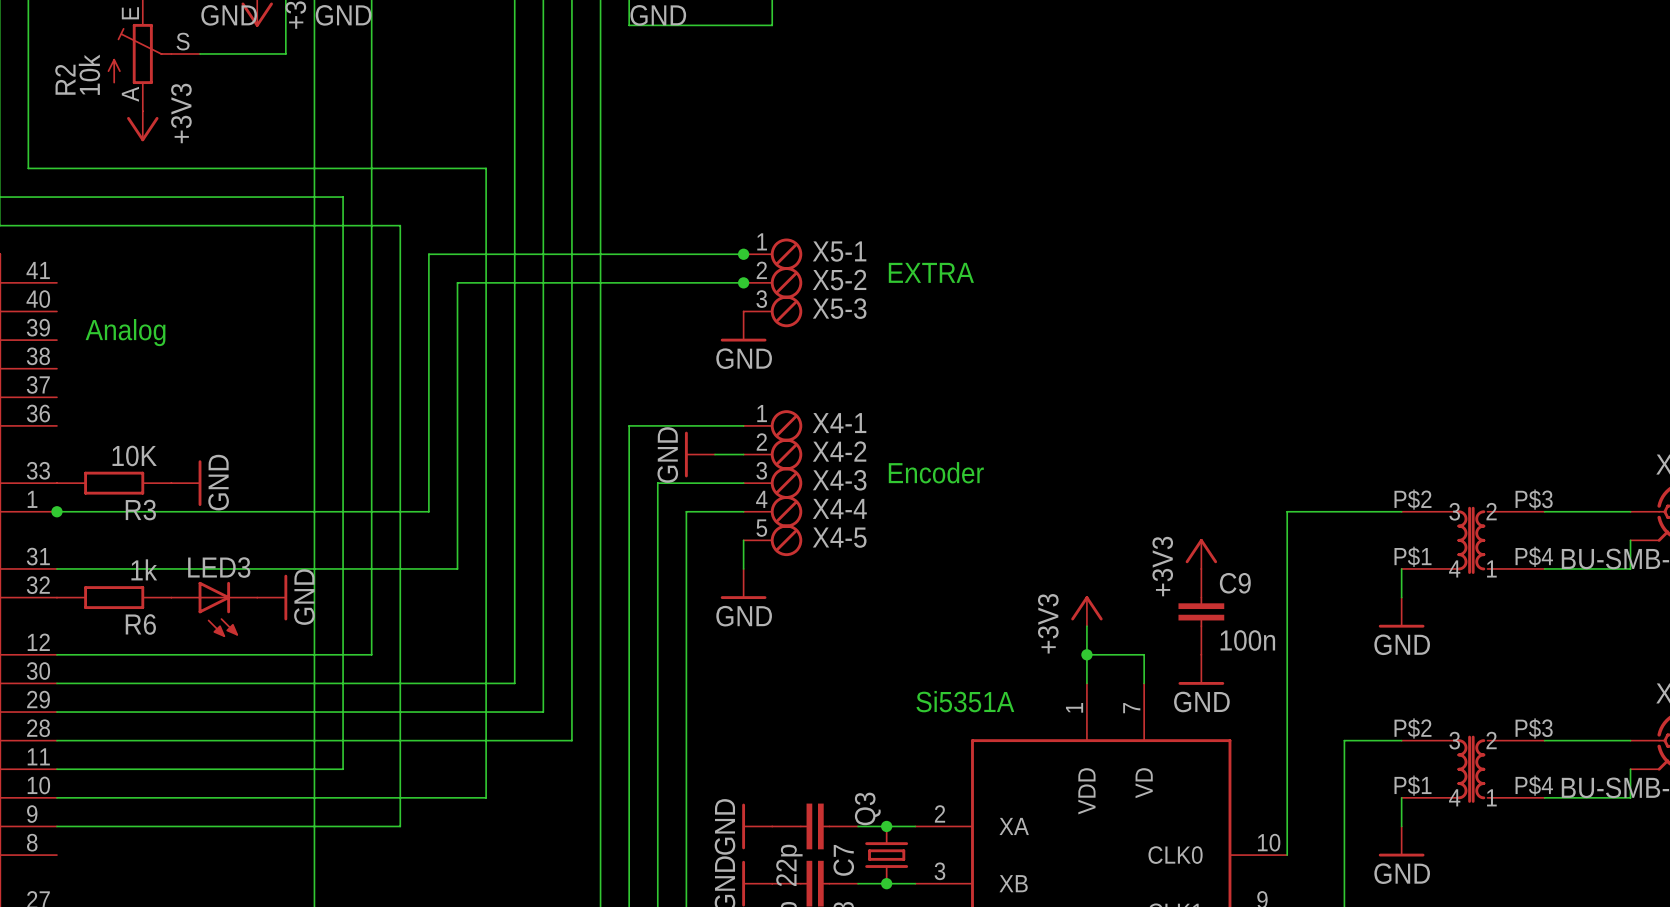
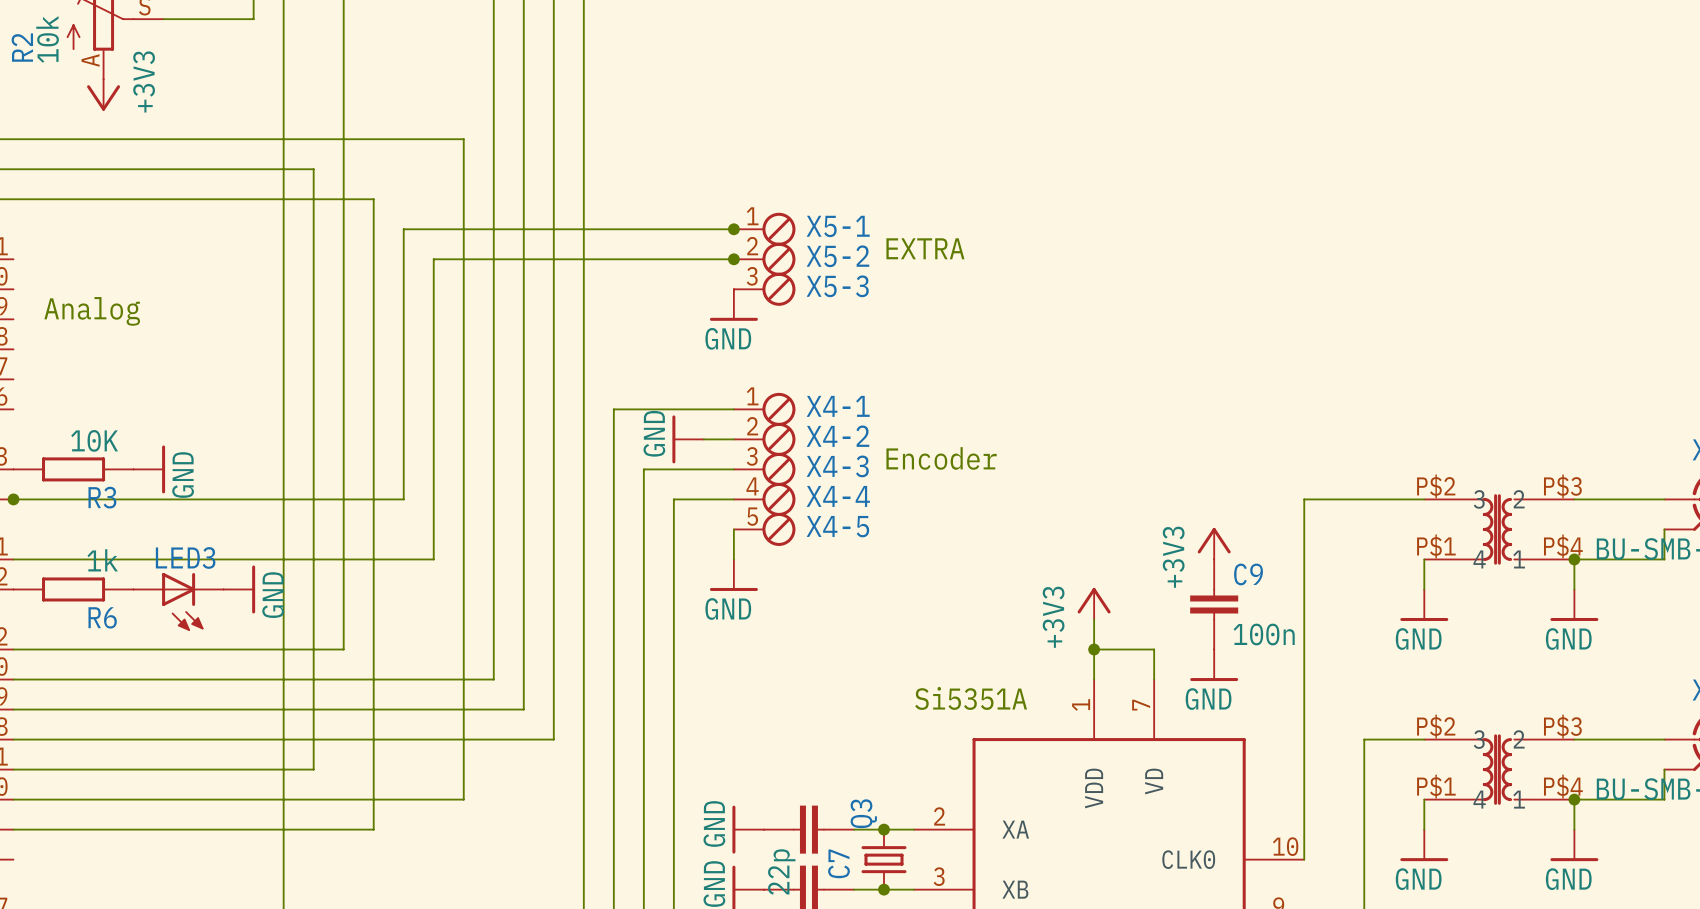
wire: none -> (1574, 559) (1574, 589)
junction: none -> (1574, 559)
power symbol: none -> GND (1574, 605)
wire: none -> (1574, 799) (1574, 829)
junction: none -> (1574, 799)
power symbol: none -> GND (1574, 845)

